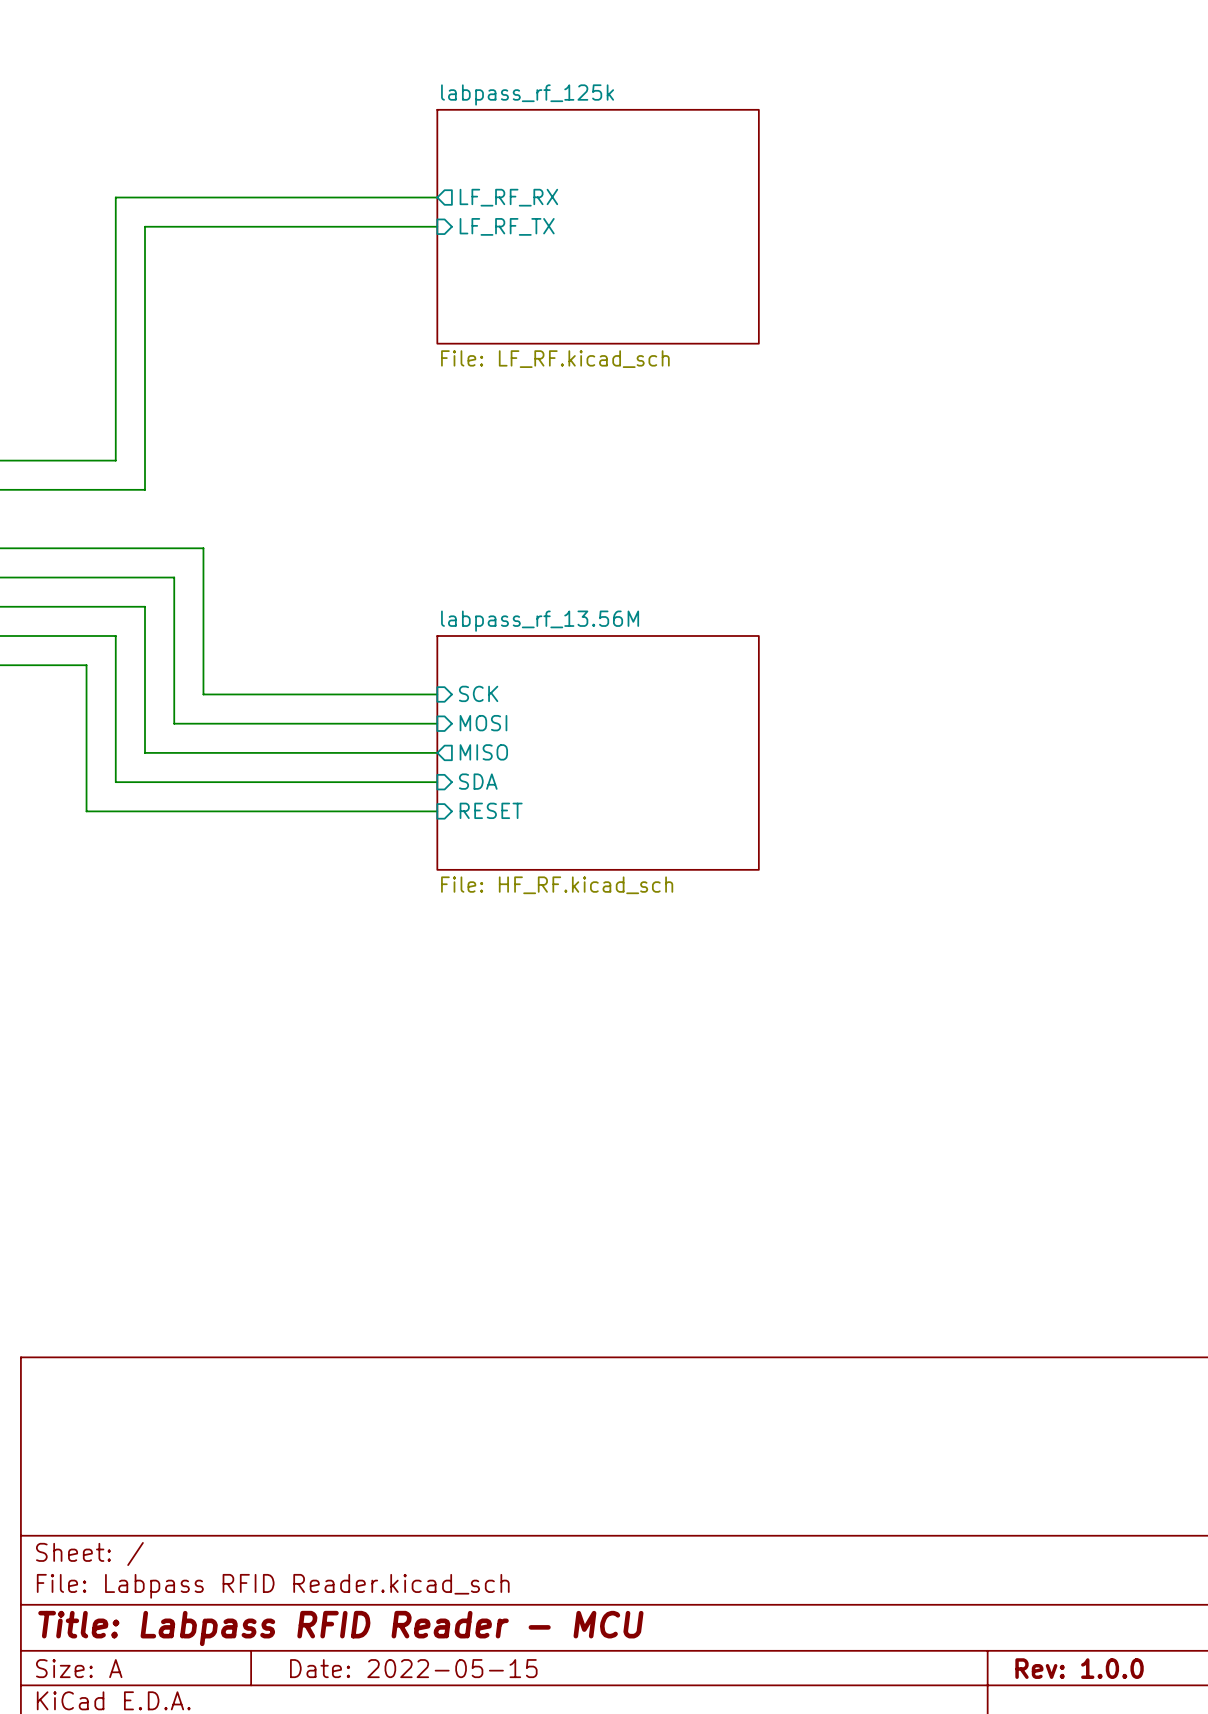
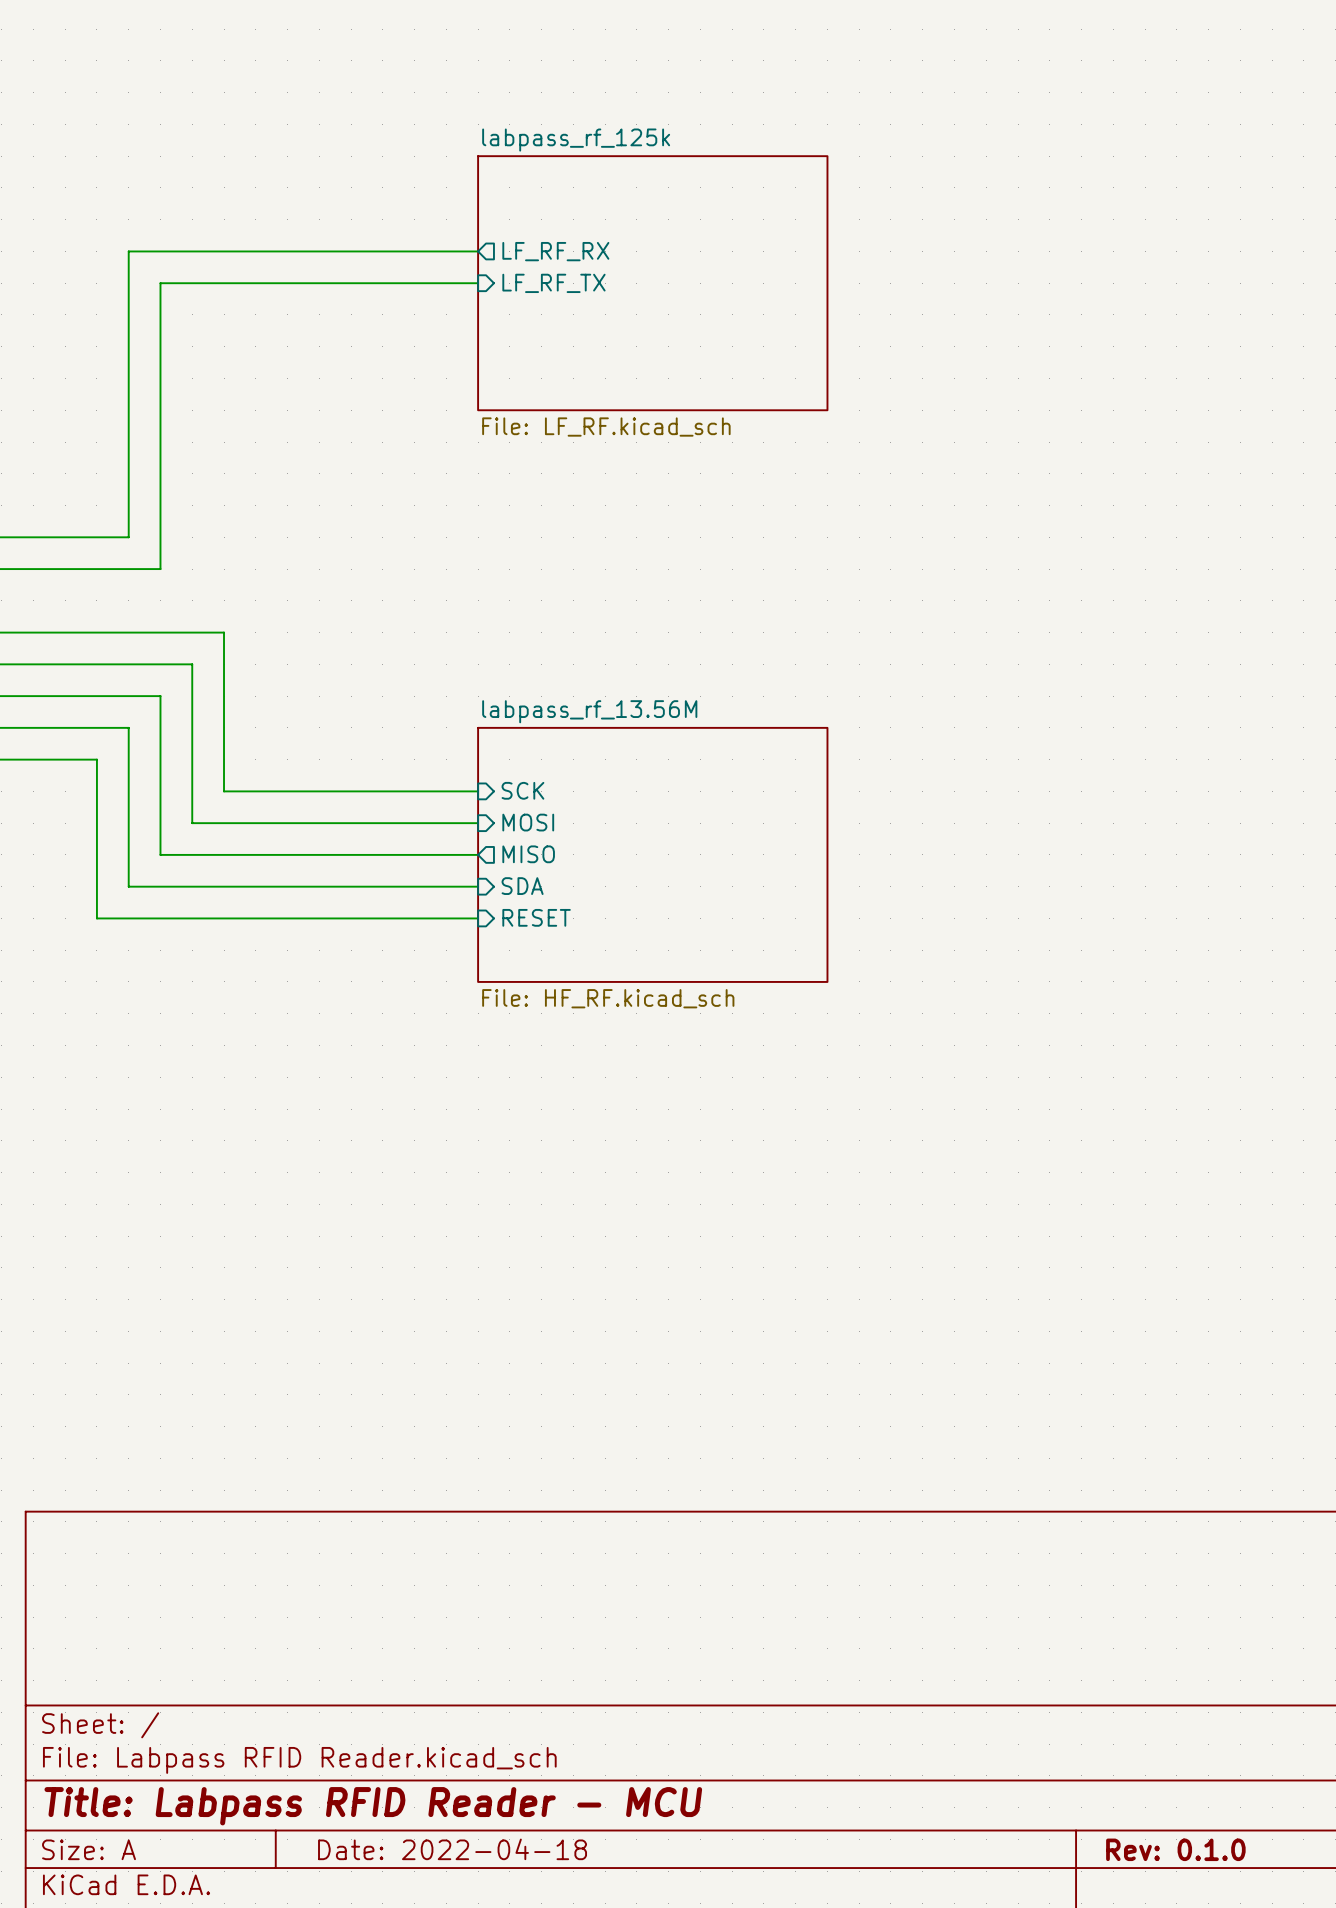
title block: Date: 2022-05-15 (413, 1668) -> Date: 2022-04-18 (452, 1849)
title block: Rev: 1.0.0 (1079, 1668) -> Rev: 0.1.0 (1175, 1849)

